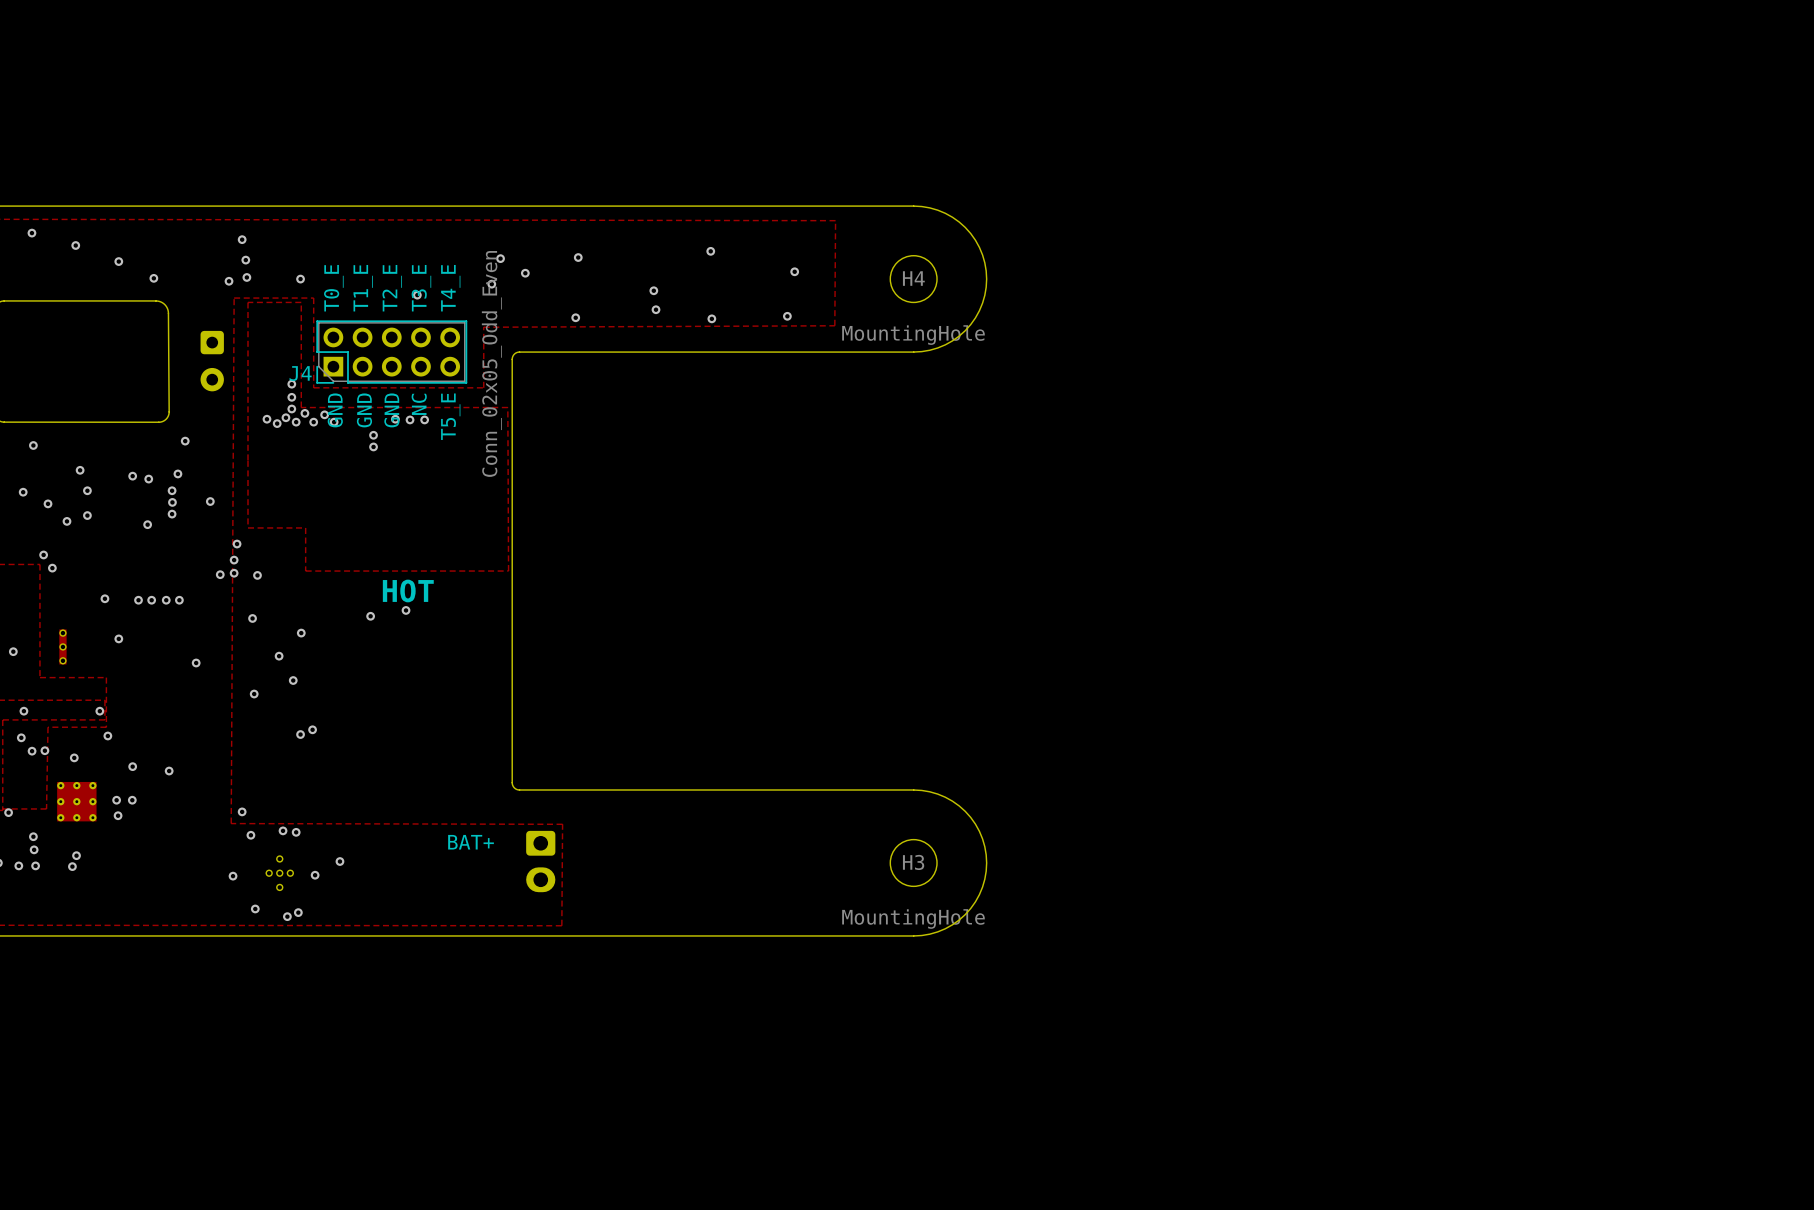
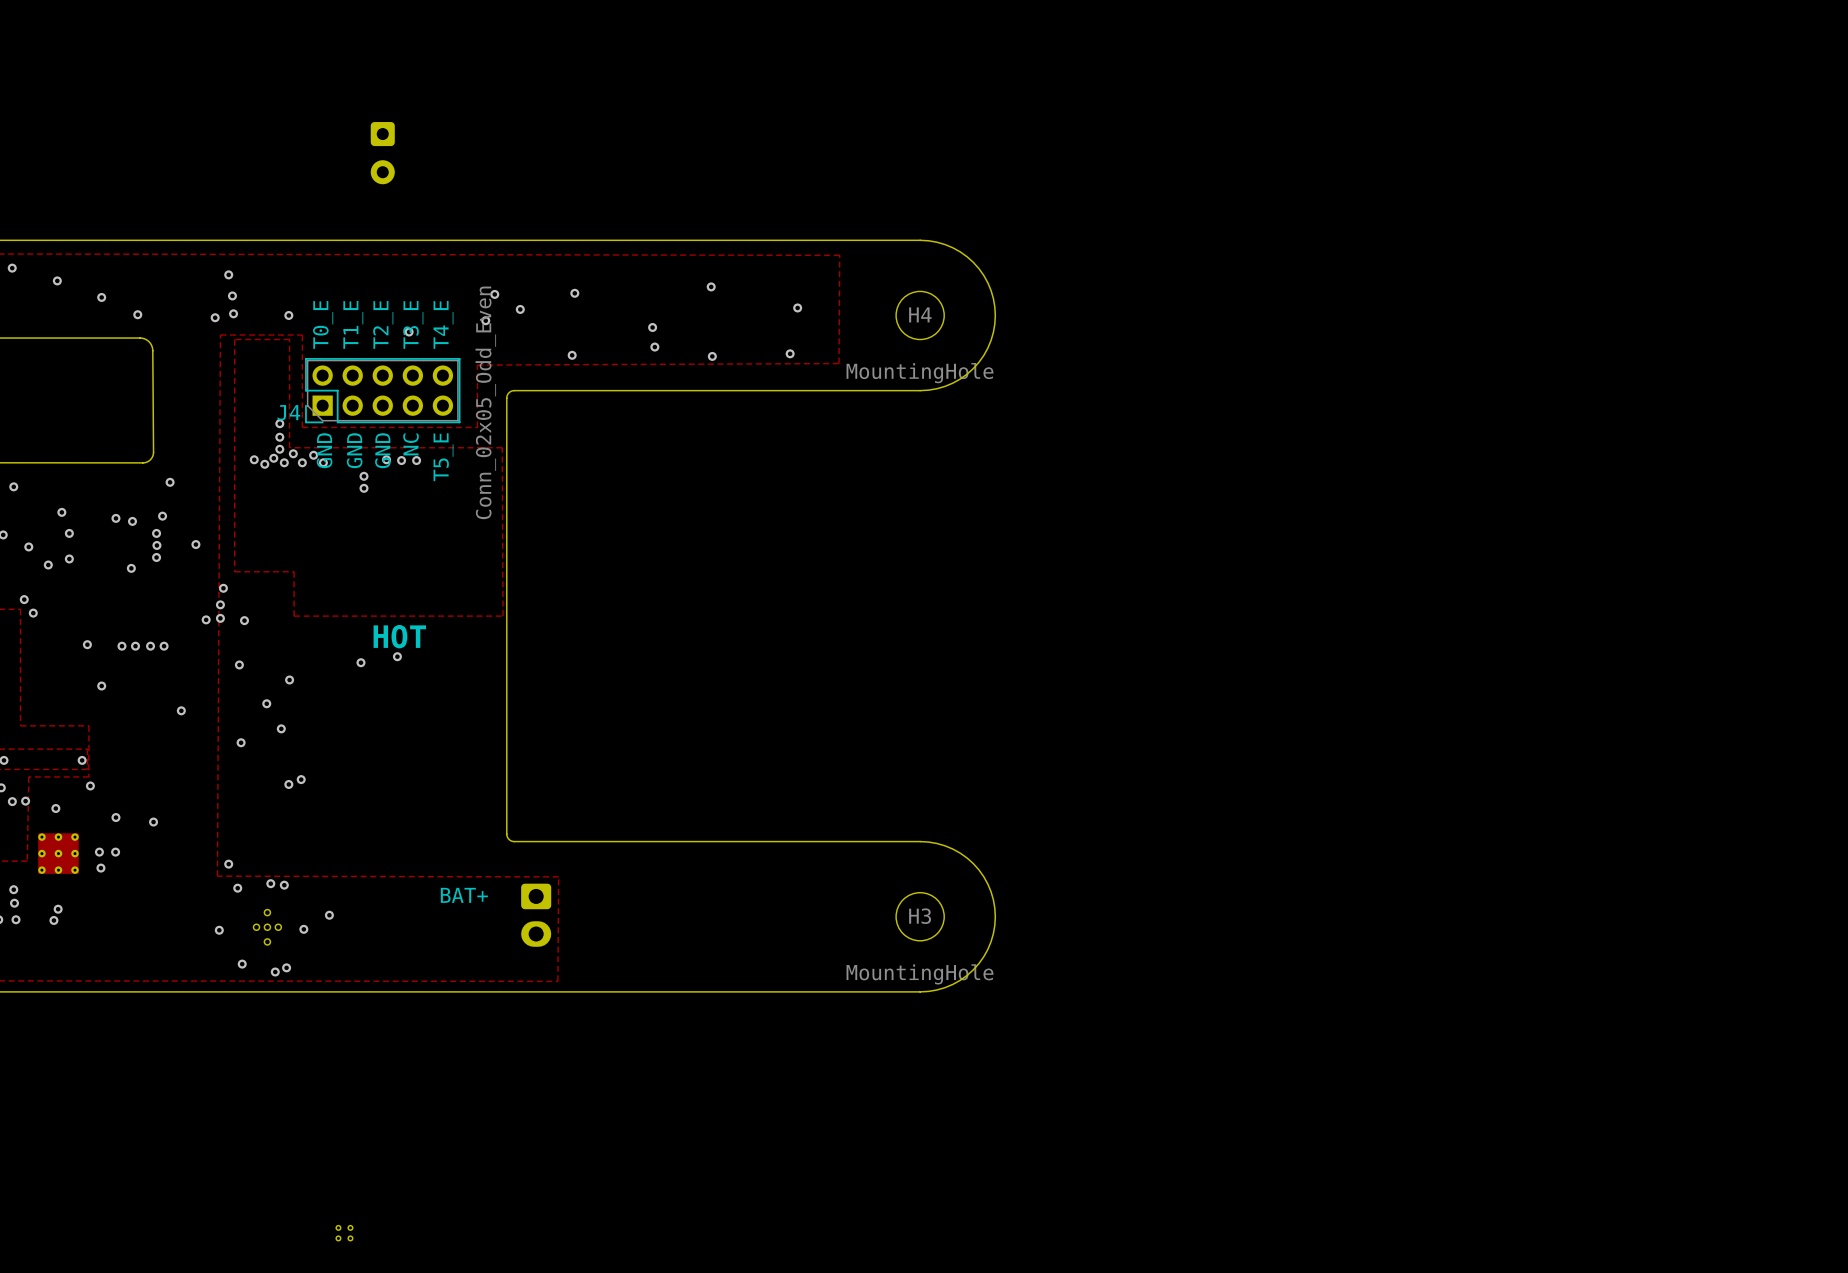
part position: (212, 361) -> (382, 153)
part: (62, 646) -> none
part: none -> (344, 1233)

